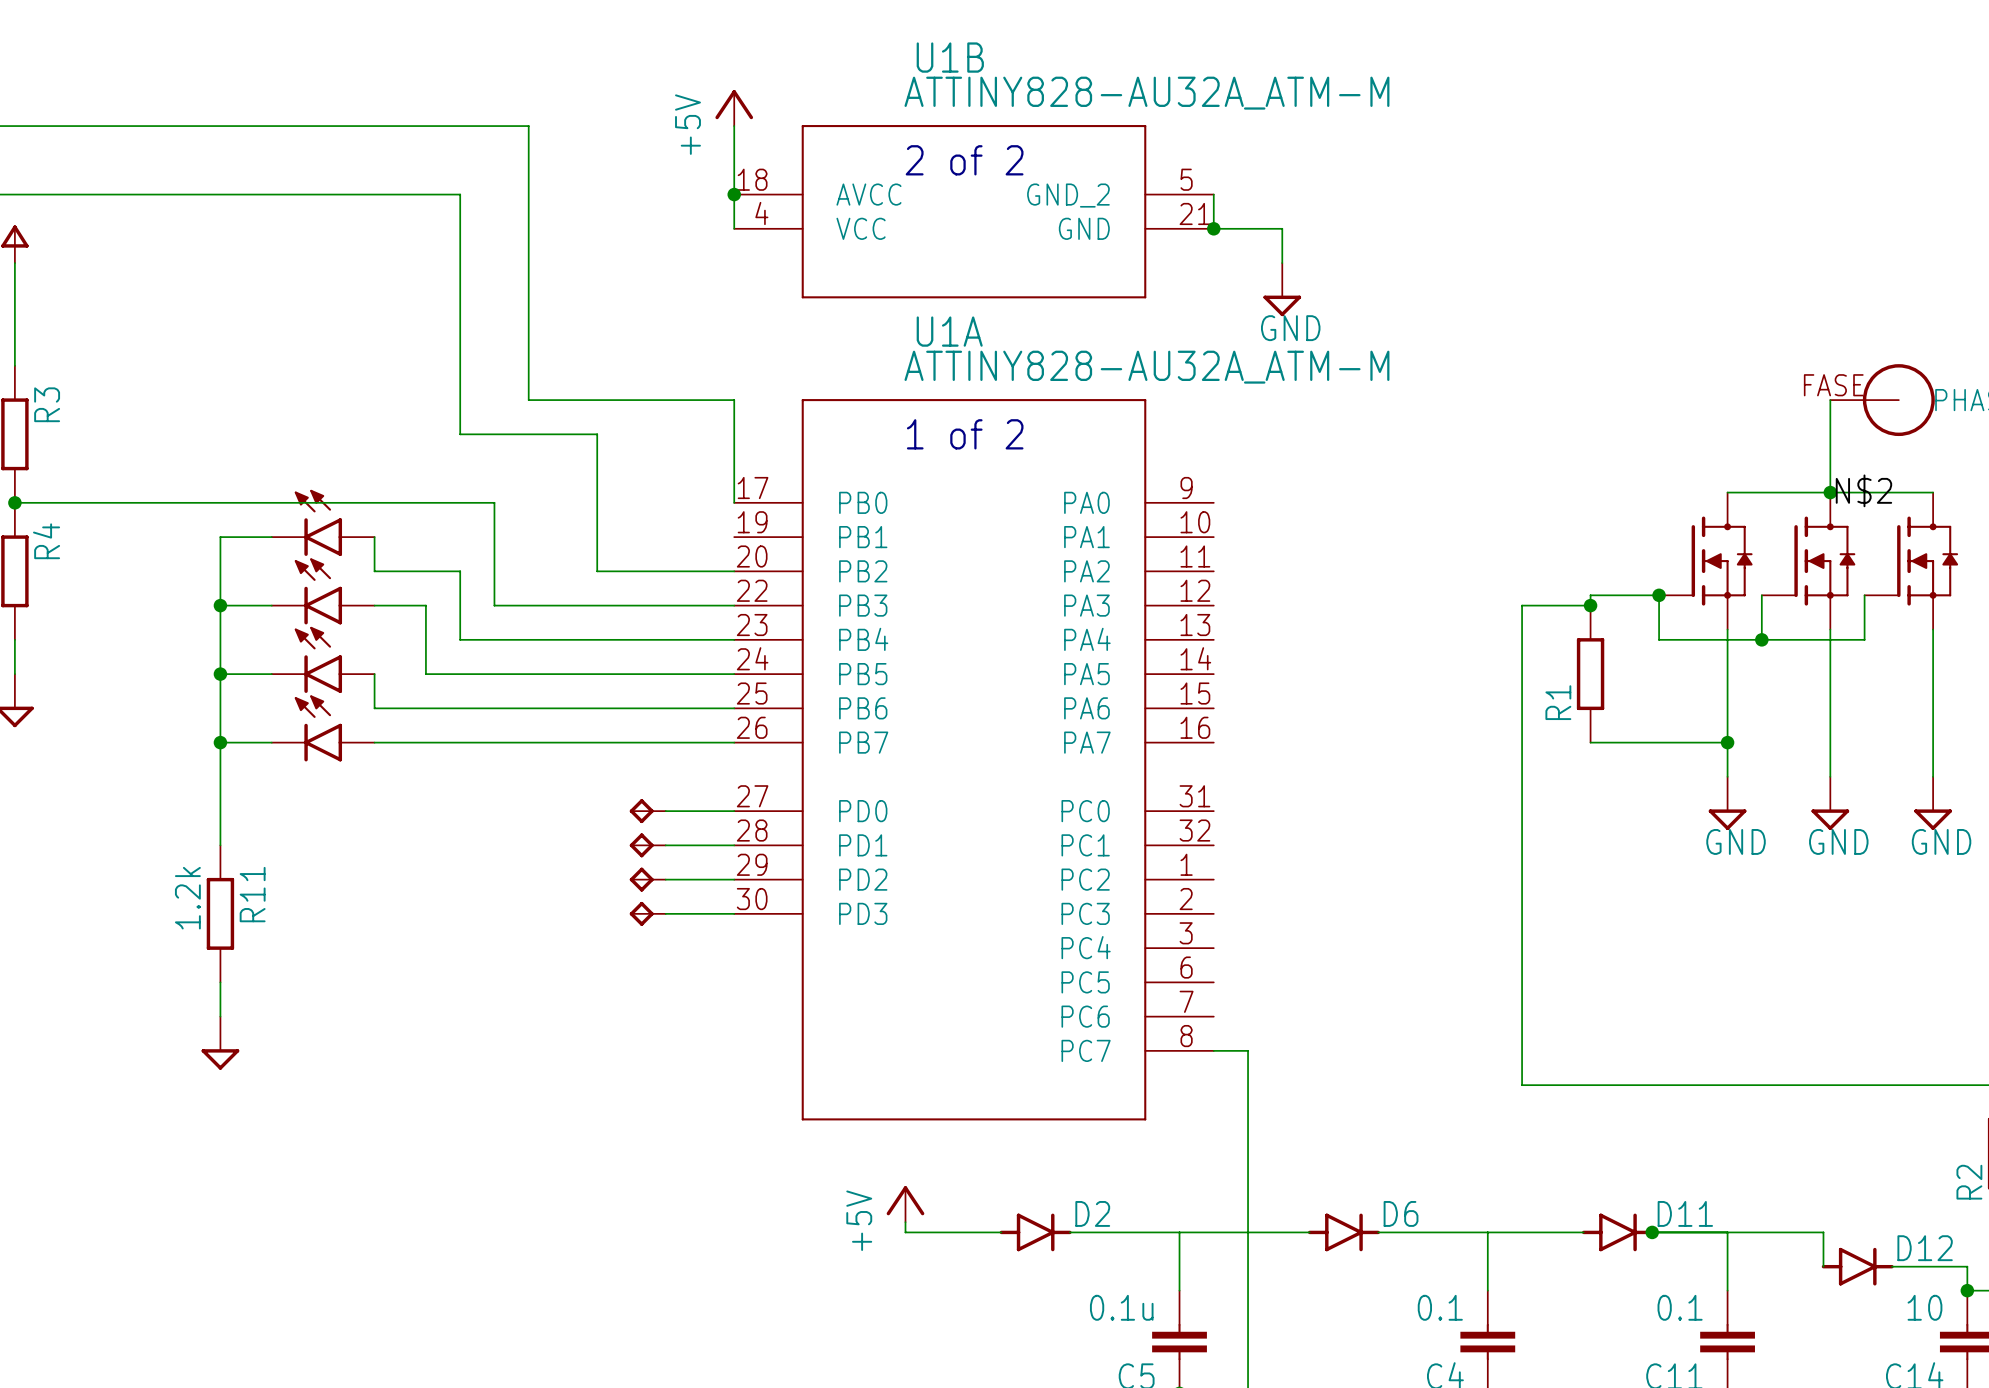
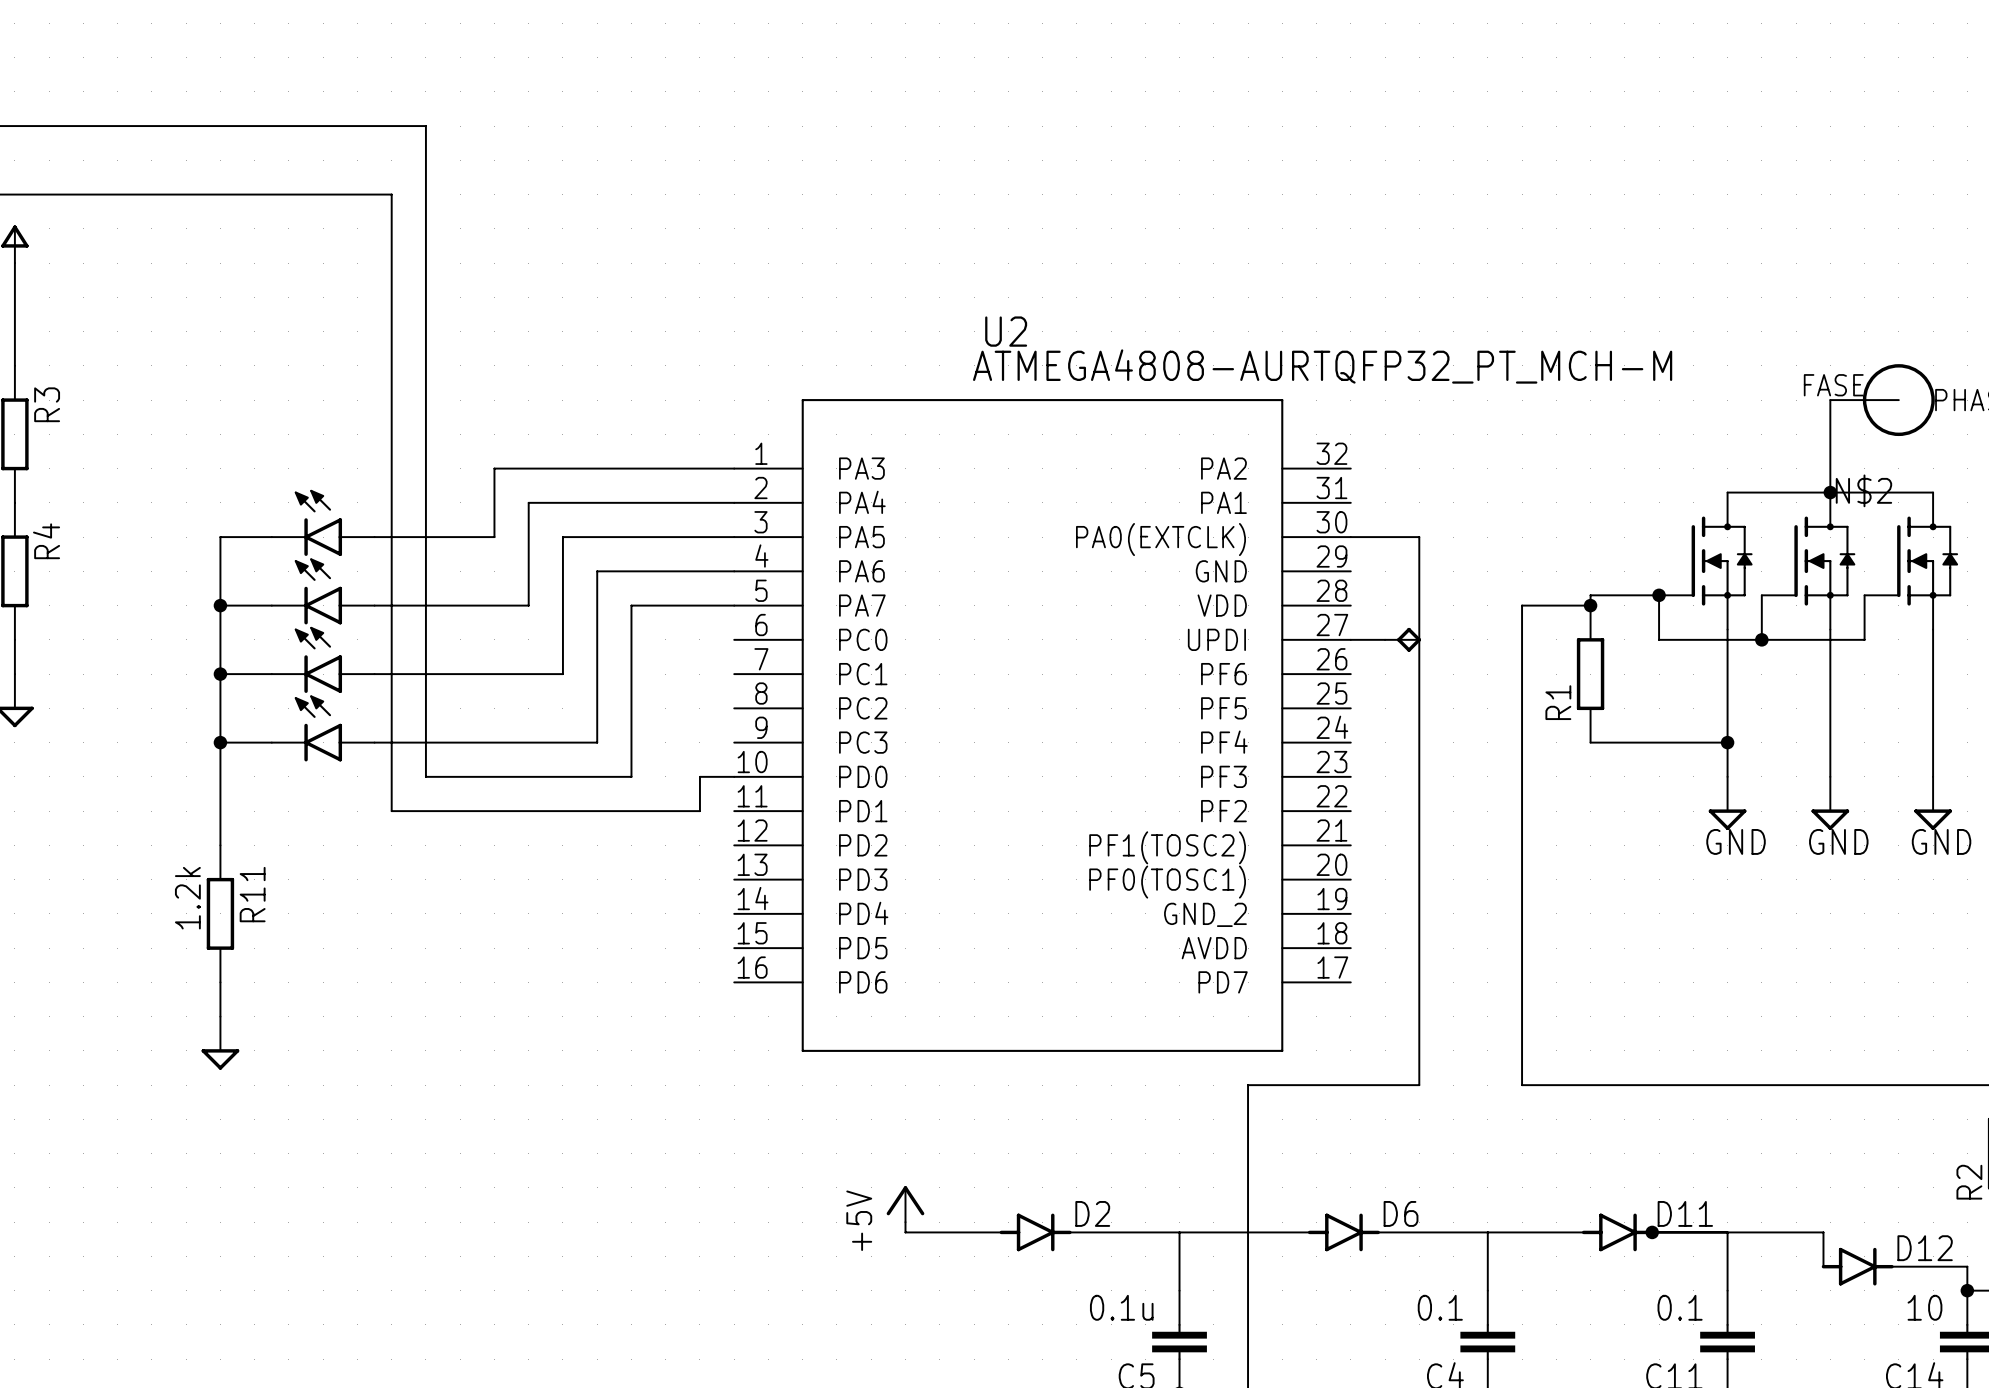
power symbol: +5V (734, 108) -> none
wire: (425, 126) (528, 126) (528, 400) (734, 400) (734, 502) -> (425, 126) (425, 605) (494, 605)
wire: (734, 126) (734, 228) -> none
wire: (391, 194) (460, 194) (460, 434) (597, 434) (597, 571) -> (391, 194) (391, 811) (665, 811)
junction: (734, 194) -> none
wire: (1213, 194) (1213, 228) (1282, 228) (1282, 263) -> none
U1B: ATTINY828-AU32A_ATM-M (974, 211) -> none
junction: (1213, 228) -> none
power symbol: GND (1282, 289) -> none
wire: (14, 502) (494, 502) -> (734, 468) (494, 468) (494, 502)
junction: (14, 502) -> none
wire: (374, 537) (374, 571) (460, 571) (460, 639) (734, 639) -> none
wire: (494, 537) (494, 605) -> (494, 537) (374, 537)
wire: (528, 605) (631, 605) -> (528, 605) (528, 502) (734, 502)
wire: none -> (1350, 639) (1385, 639)
part: none -> (1403, 639)
wire: (374, 674) (374, 708) (734, 708) -> (374, 674) (425, 674) (425, 776) (631, 776) (631, 605)
wire: (562, 674) (734, 674) -> (562, 674) (562, 537) (734, 537)
U2: none -> ATMEGA4808-AURTQFP32_PT_MCH-M (1042, 725)
wire: (597, 742) (734, 742) -> (597, 742) (597, 571)
U1A: ATTINY828-AU32A_ATM-M (974, 759) -> none
part: (647, 811) -> none
wire: (699, 811) (734, 811) -> (699, 811) (699, 776) (734, 776)
part: (647, 845) -> none
wire: (665, 845) (734, 845) -> none
part: (647, 879) -> none
wire: (665, 879) (734, 879) -> none
part: (647, 913) -> none
wire: (665, 913) (734, 913) -> none
wire: (1213, 1050) (1248, 1050) (1248, 1085) -> (1350, 537) (1419, 537) (1419, 1085) (1248, 1085)

